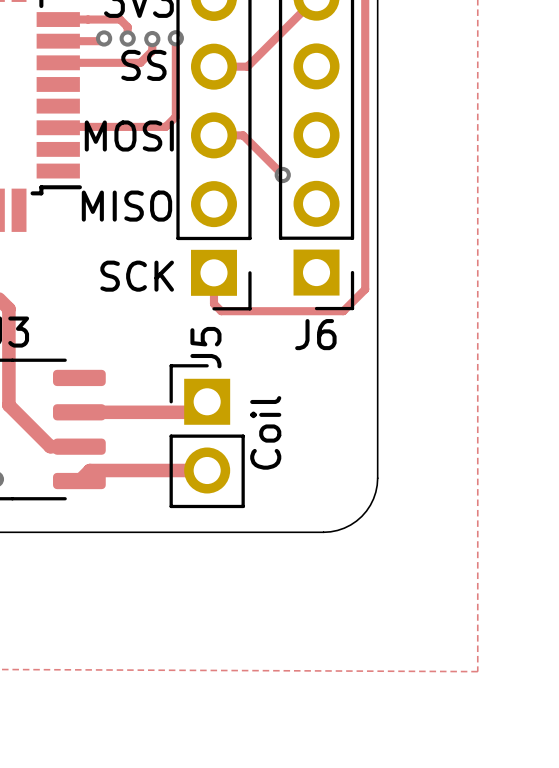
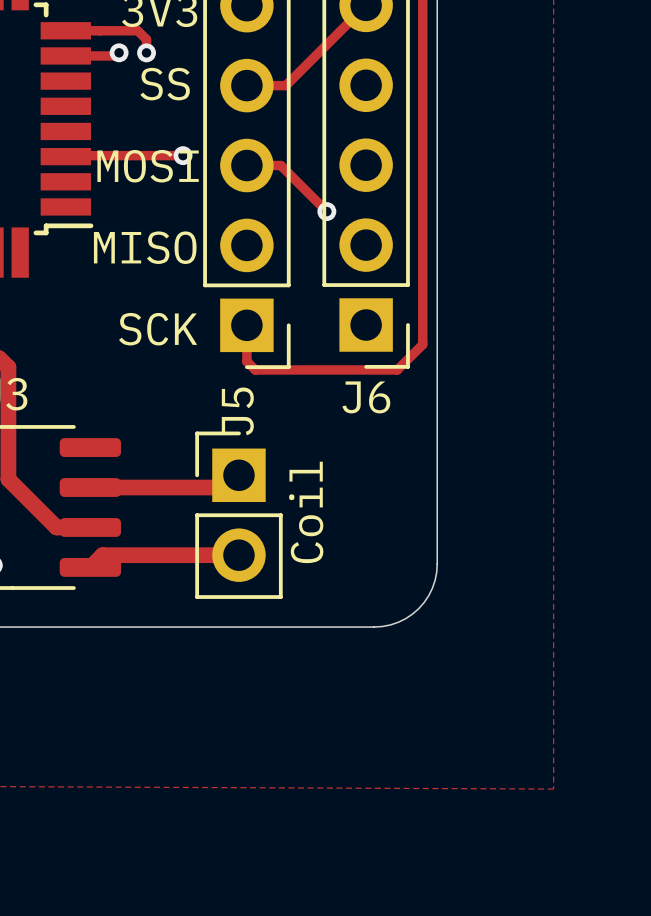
track: (175, 38) (175, 116) (165, 126) (159, 126) -> none
via: (175, 38) -> none
track: (152, 39) (152, 50) (140, 62) (58, 62) -> none
via: (152, 39) -> none
via: none -> (183, 155)

